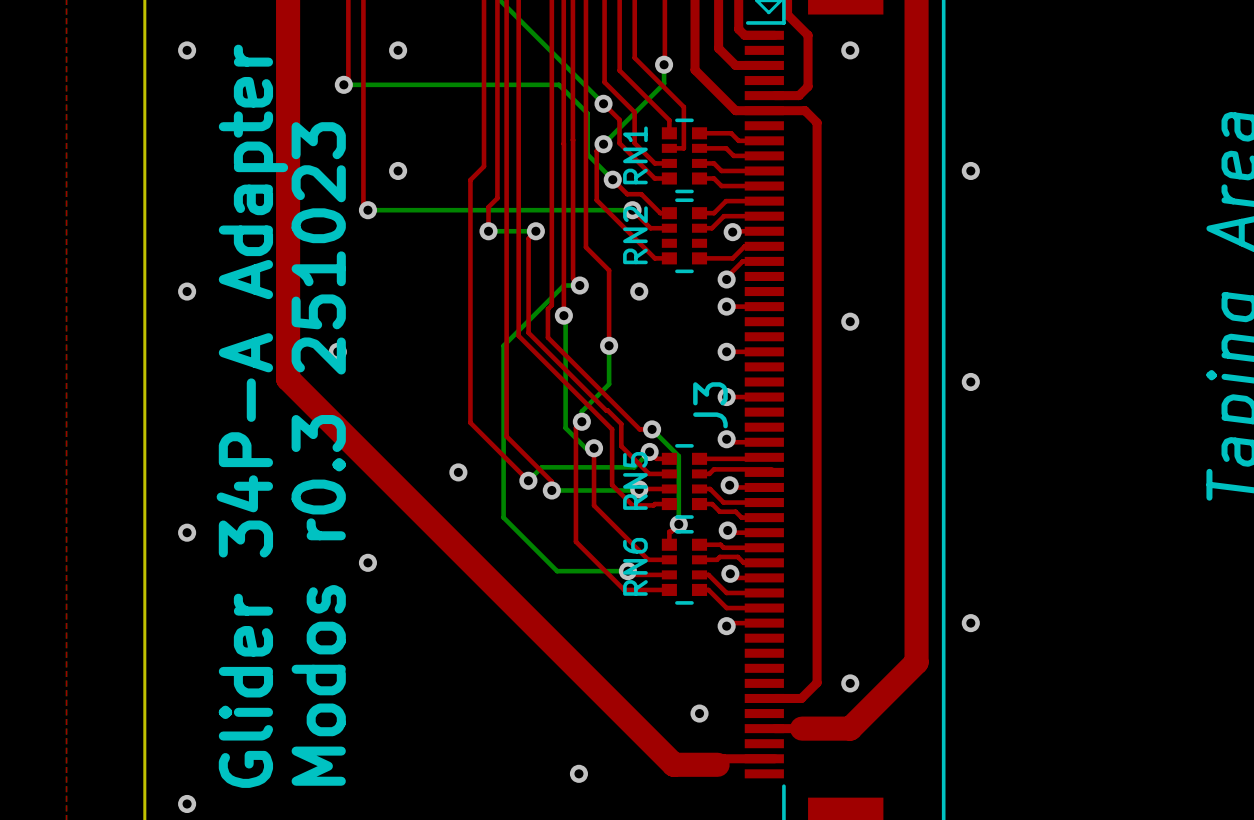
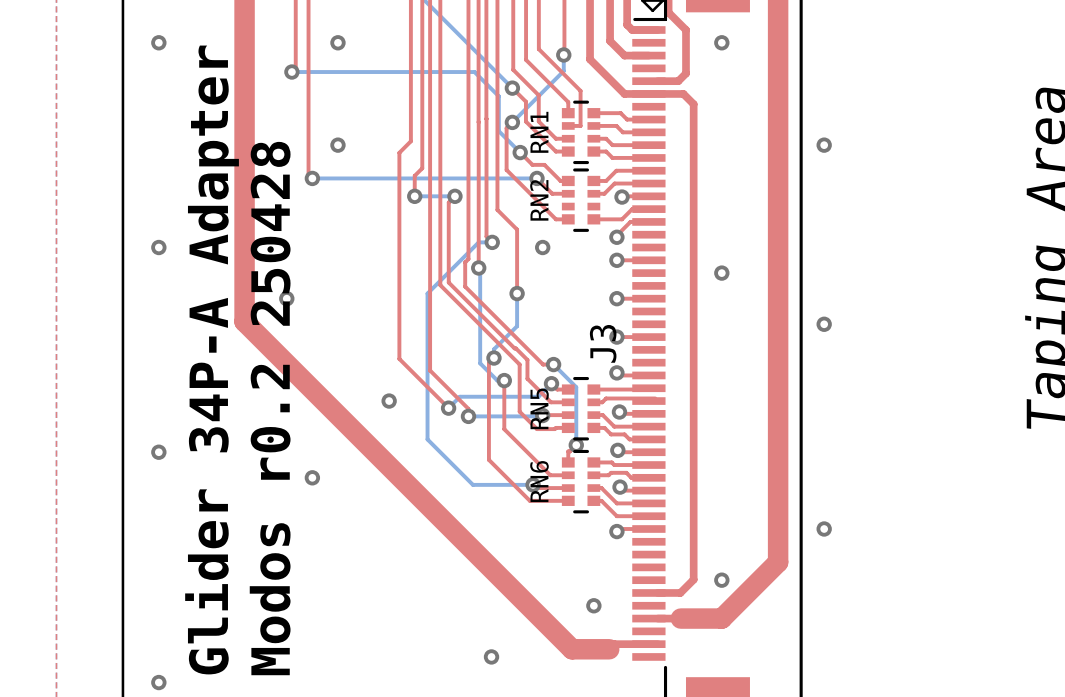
text: Modos r0.3 251023 (318, 453) -> Modos r0.2 250428 (270, 408)

